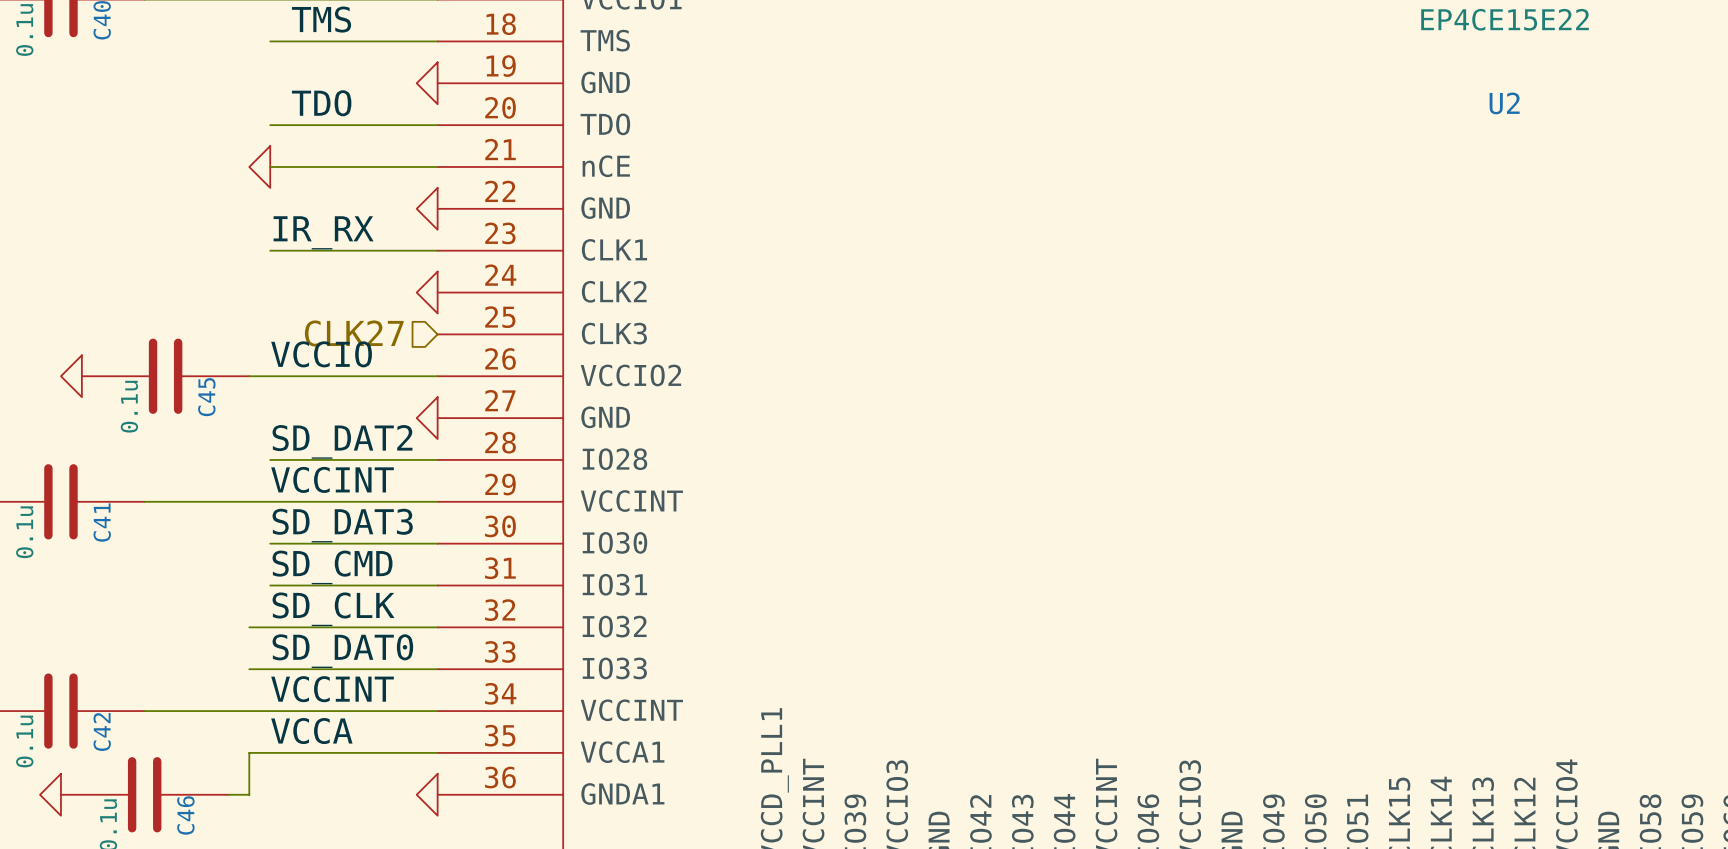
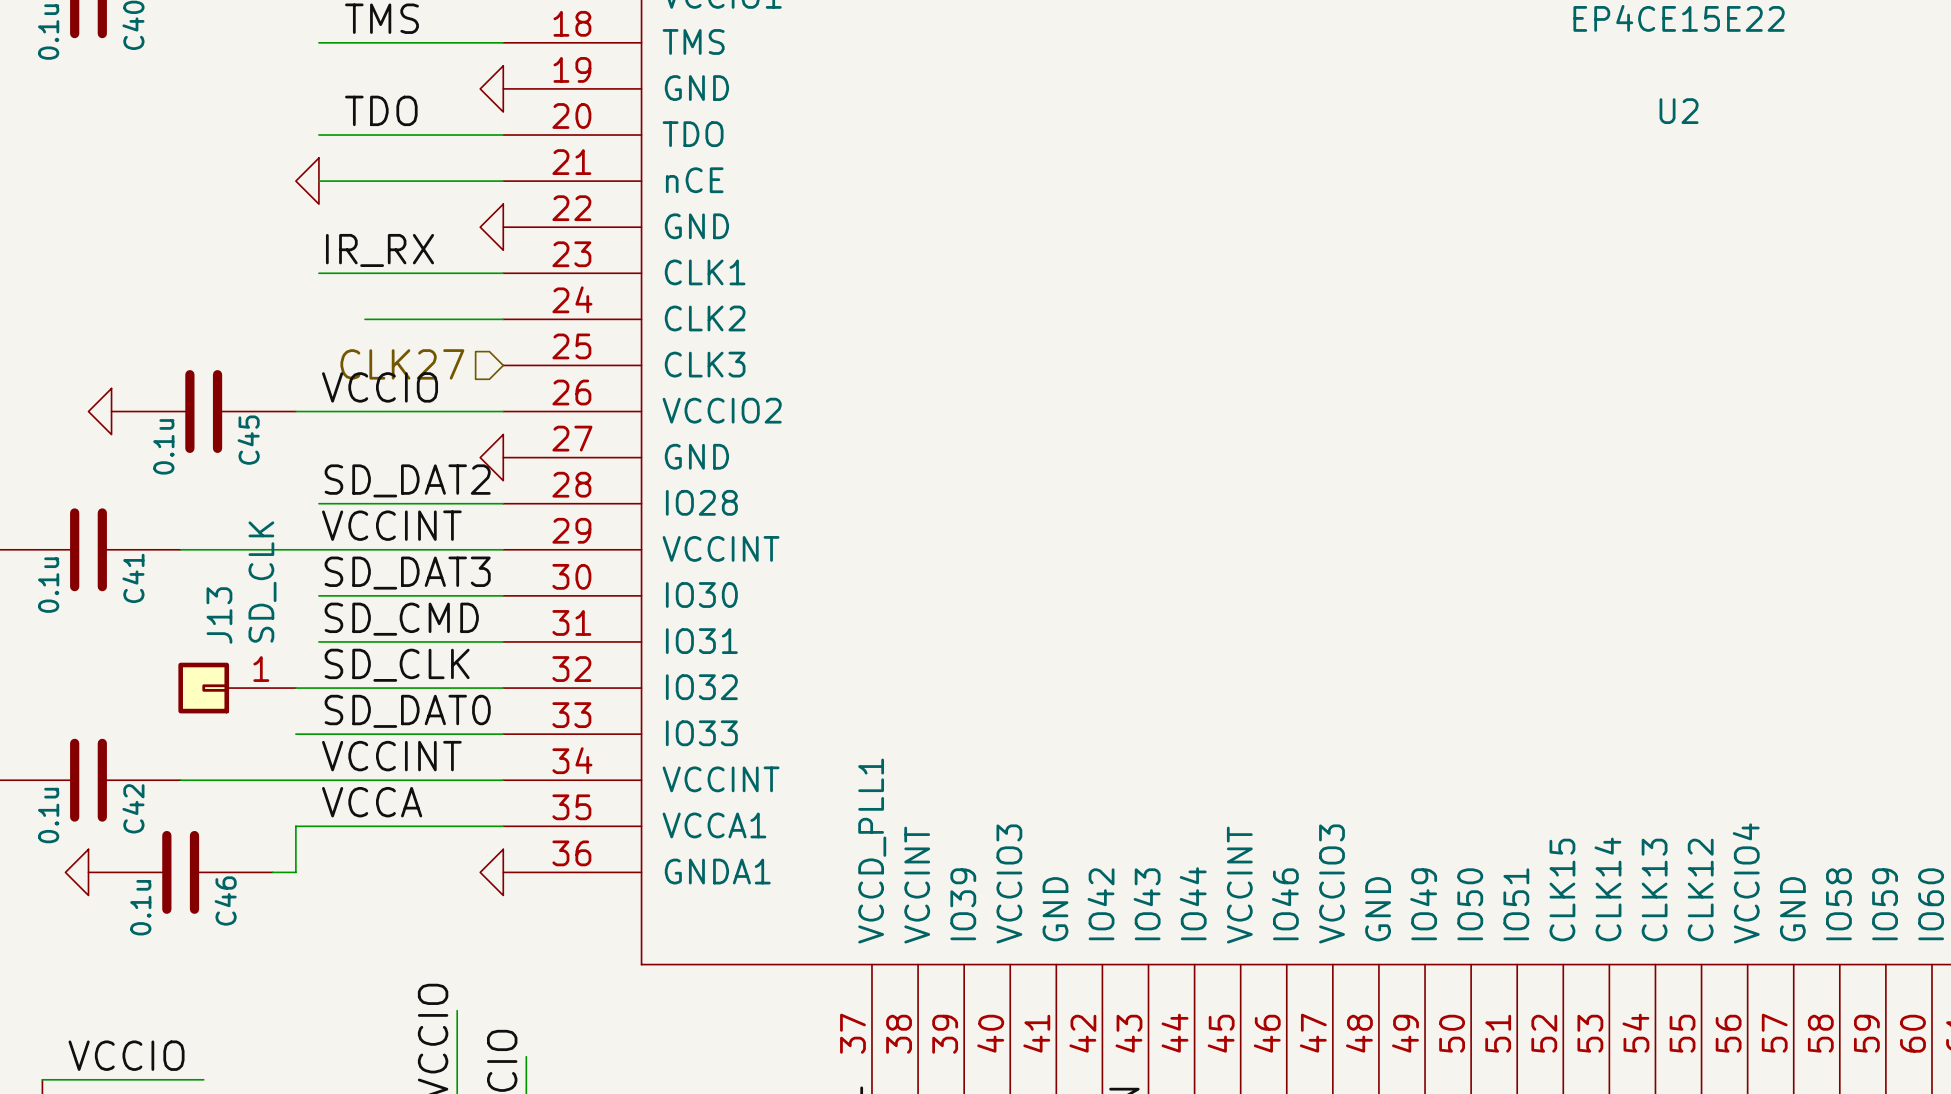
wire: none -> (365, 319) (503, 319)
power symbol: (427, 292) -> none
J13: none -> SD_CLK (237, 688)

